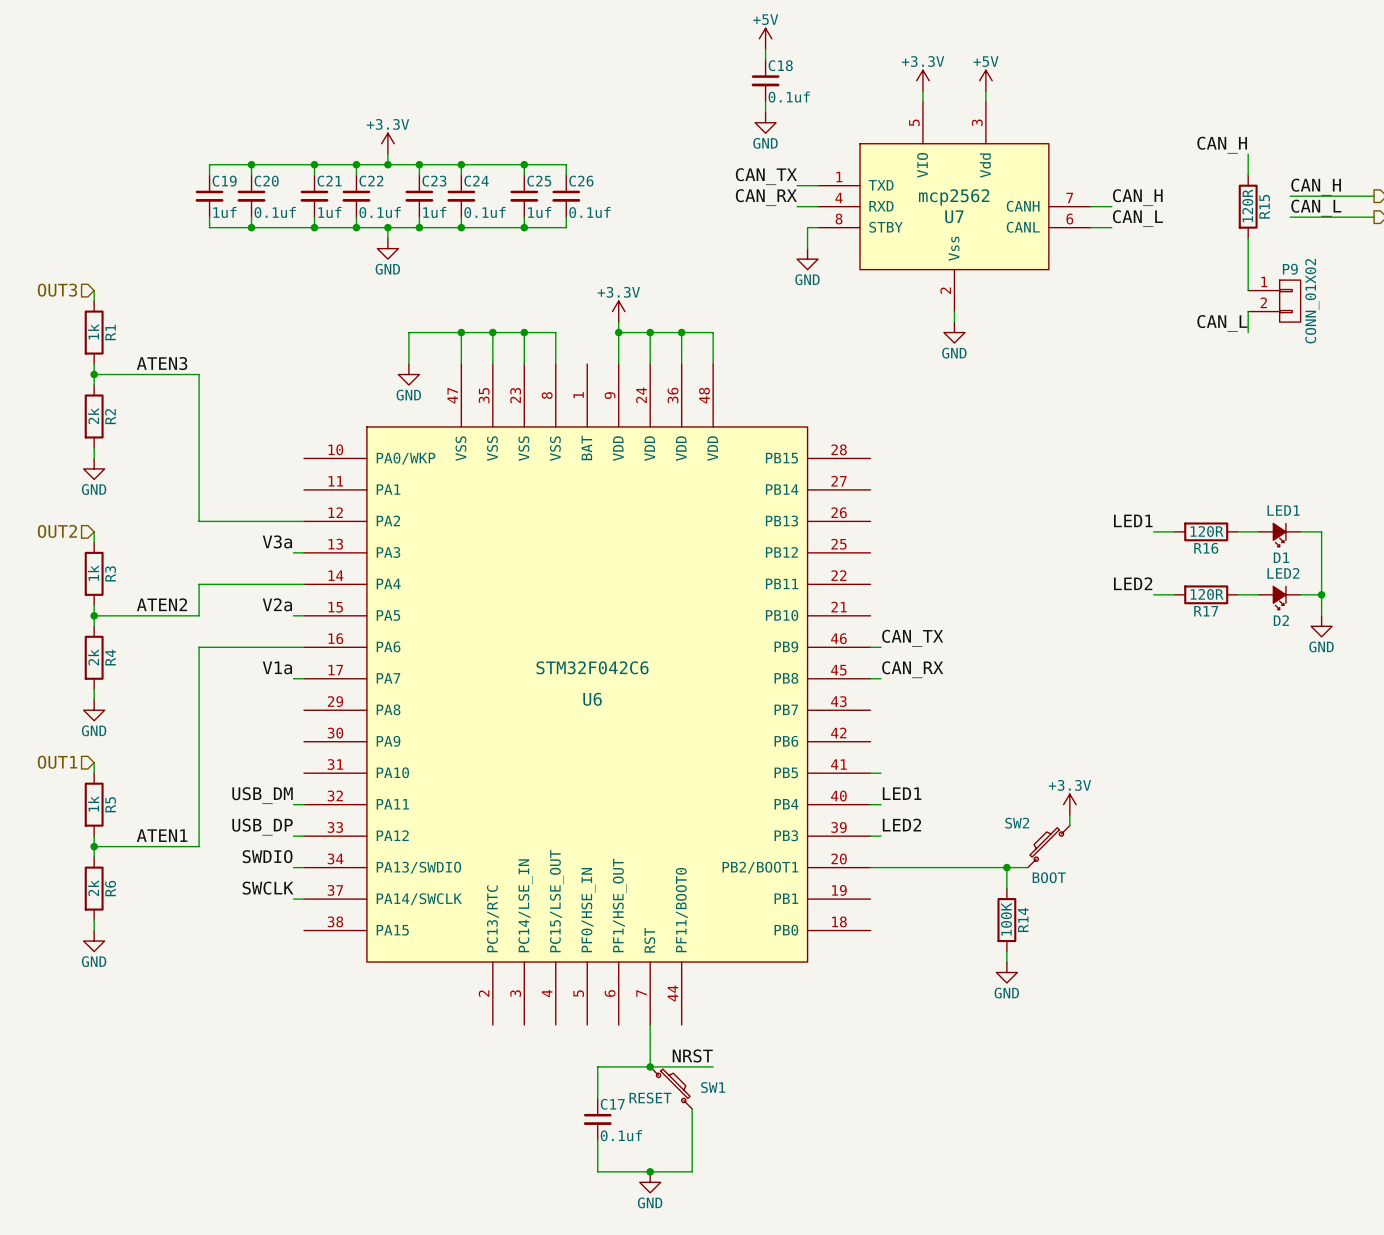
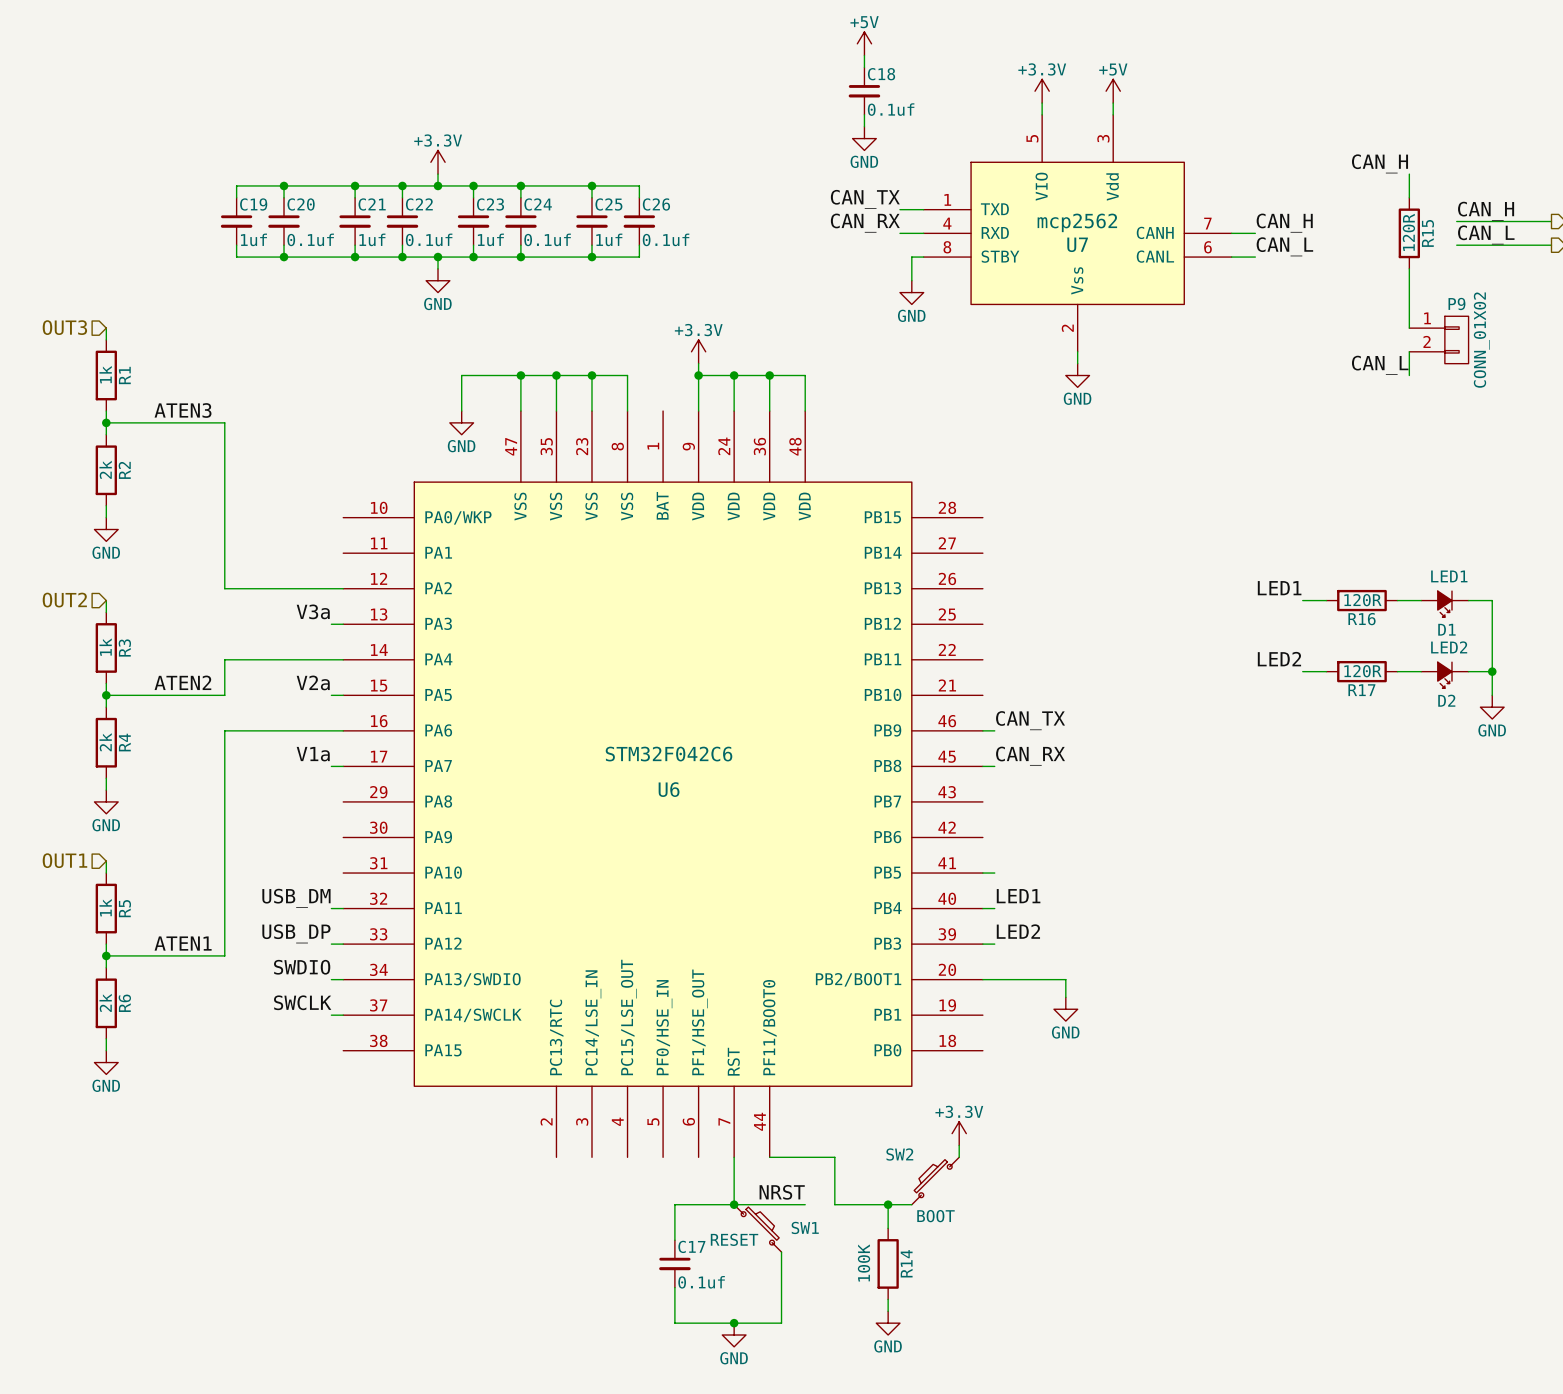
power symbol: +3.3V (1069, 804) -> none
wire: (1069, 815) (1069, 825) -> none
SW2 position: (1048, 846) -> (935, 1181)
wire: (943, 867) (1027, 867) -> (1065, 979) (1065, 997)
wire: (1006, 867) (1006, 888) -> none
junction: (1006, 867) -> none
R14 value position: 100K (1006, 919) -> 100K (864, 1262)
R14 position: (1006, 920) -> (888, 1263)
wire: (1006, 951) (1006, 962) -> (959, 1145) (959, 1157)
power symbol position: GND (1006, 972) -> GND (1065, 1009)
power symbol: none -> +3.3V (959, 1133)
wire: none -> (769, 1157) (834, 1157) (834, 1204) (911, 1204)
wire: none -> (888, 1204) (888, 1228)
junction: none -> (888, 1204)
wire: none -> (888, 1299) (888, 1311)
power symbol: none -> GND (888, 1323)

